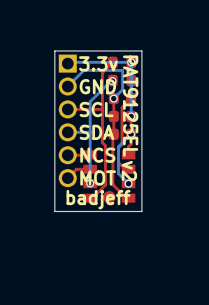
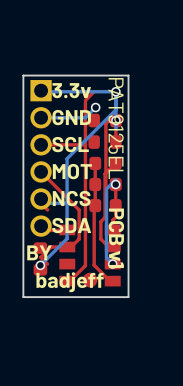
top track: none -> (94, 91) (85, 100)
via: none -> (115, 91)
board edge: (141, 50) (54, 50) (54, 211) (141, 211) -> (128, 107) (128, 75) (23, 75) (23, 297) (128, 297)
bottom track: none -> (95, 107) (85, 117) (41, 117)
via: none -> (95, 107)
bottom track: none -> (115, 109) (67, 158) (67, 238) (40, 265)
top track: none -> (115, 114) (105, 123) (105, 213)
top track: (112, 62) (102, 72) (102, 142) (105, 145) -> (85, 102) (85, 219)
bottom track: (131, 62) (67, 63) -> (115, 120) (115, 91) (41, 90)
text position: 3.3v (98, 63) -> 3.3v (71, 90)
bottom track: (131, 69) (131, 116) -> none
bottom track: (111, 80) (112, 79) (90, 101) (90, 183) -> none
via: (112, 81) -> none
top track: none -> (41, 144) (85, 144)
bottom track: (67, 86) (83, 70) (122, 70) (122, 89) (113, 98) -> none
text position: GND (97, 86) -> GND (71, 117)
via: (113, 98) -> none
top track: none -> (41, 171) (79, 210) (79, 239) (71, 247)
text position: PAT9125EL (130, 106) -> PAT9125EL (116, 128)
text position: SCL (96, 109) -> SCL (70, 144)
top track: (102, 109) (67, 109) -> none
bottom track: none -> (115, 179) (106, 188)
part position: (67, 120) -> (41, 158)
text position: SDA (96, 132) -> SDA (71, 225)
bottom track: (130, 134) (118, 146) (118, 173) (123, 178) -> (106, 191) (106, 257)
via: (131, 134) -> none
text position: NCS (97, 155) -> NCS (71, 198)
text: v2 (129, 170) -> none
text: none -> PCB v1 (116, 238)
text: none -> BY (39, 252)
text position: MOT (98, 178) -> MOT (72, 171)
part: none -> (40, 258)
via position: (90, 183) -> (40, 265)

